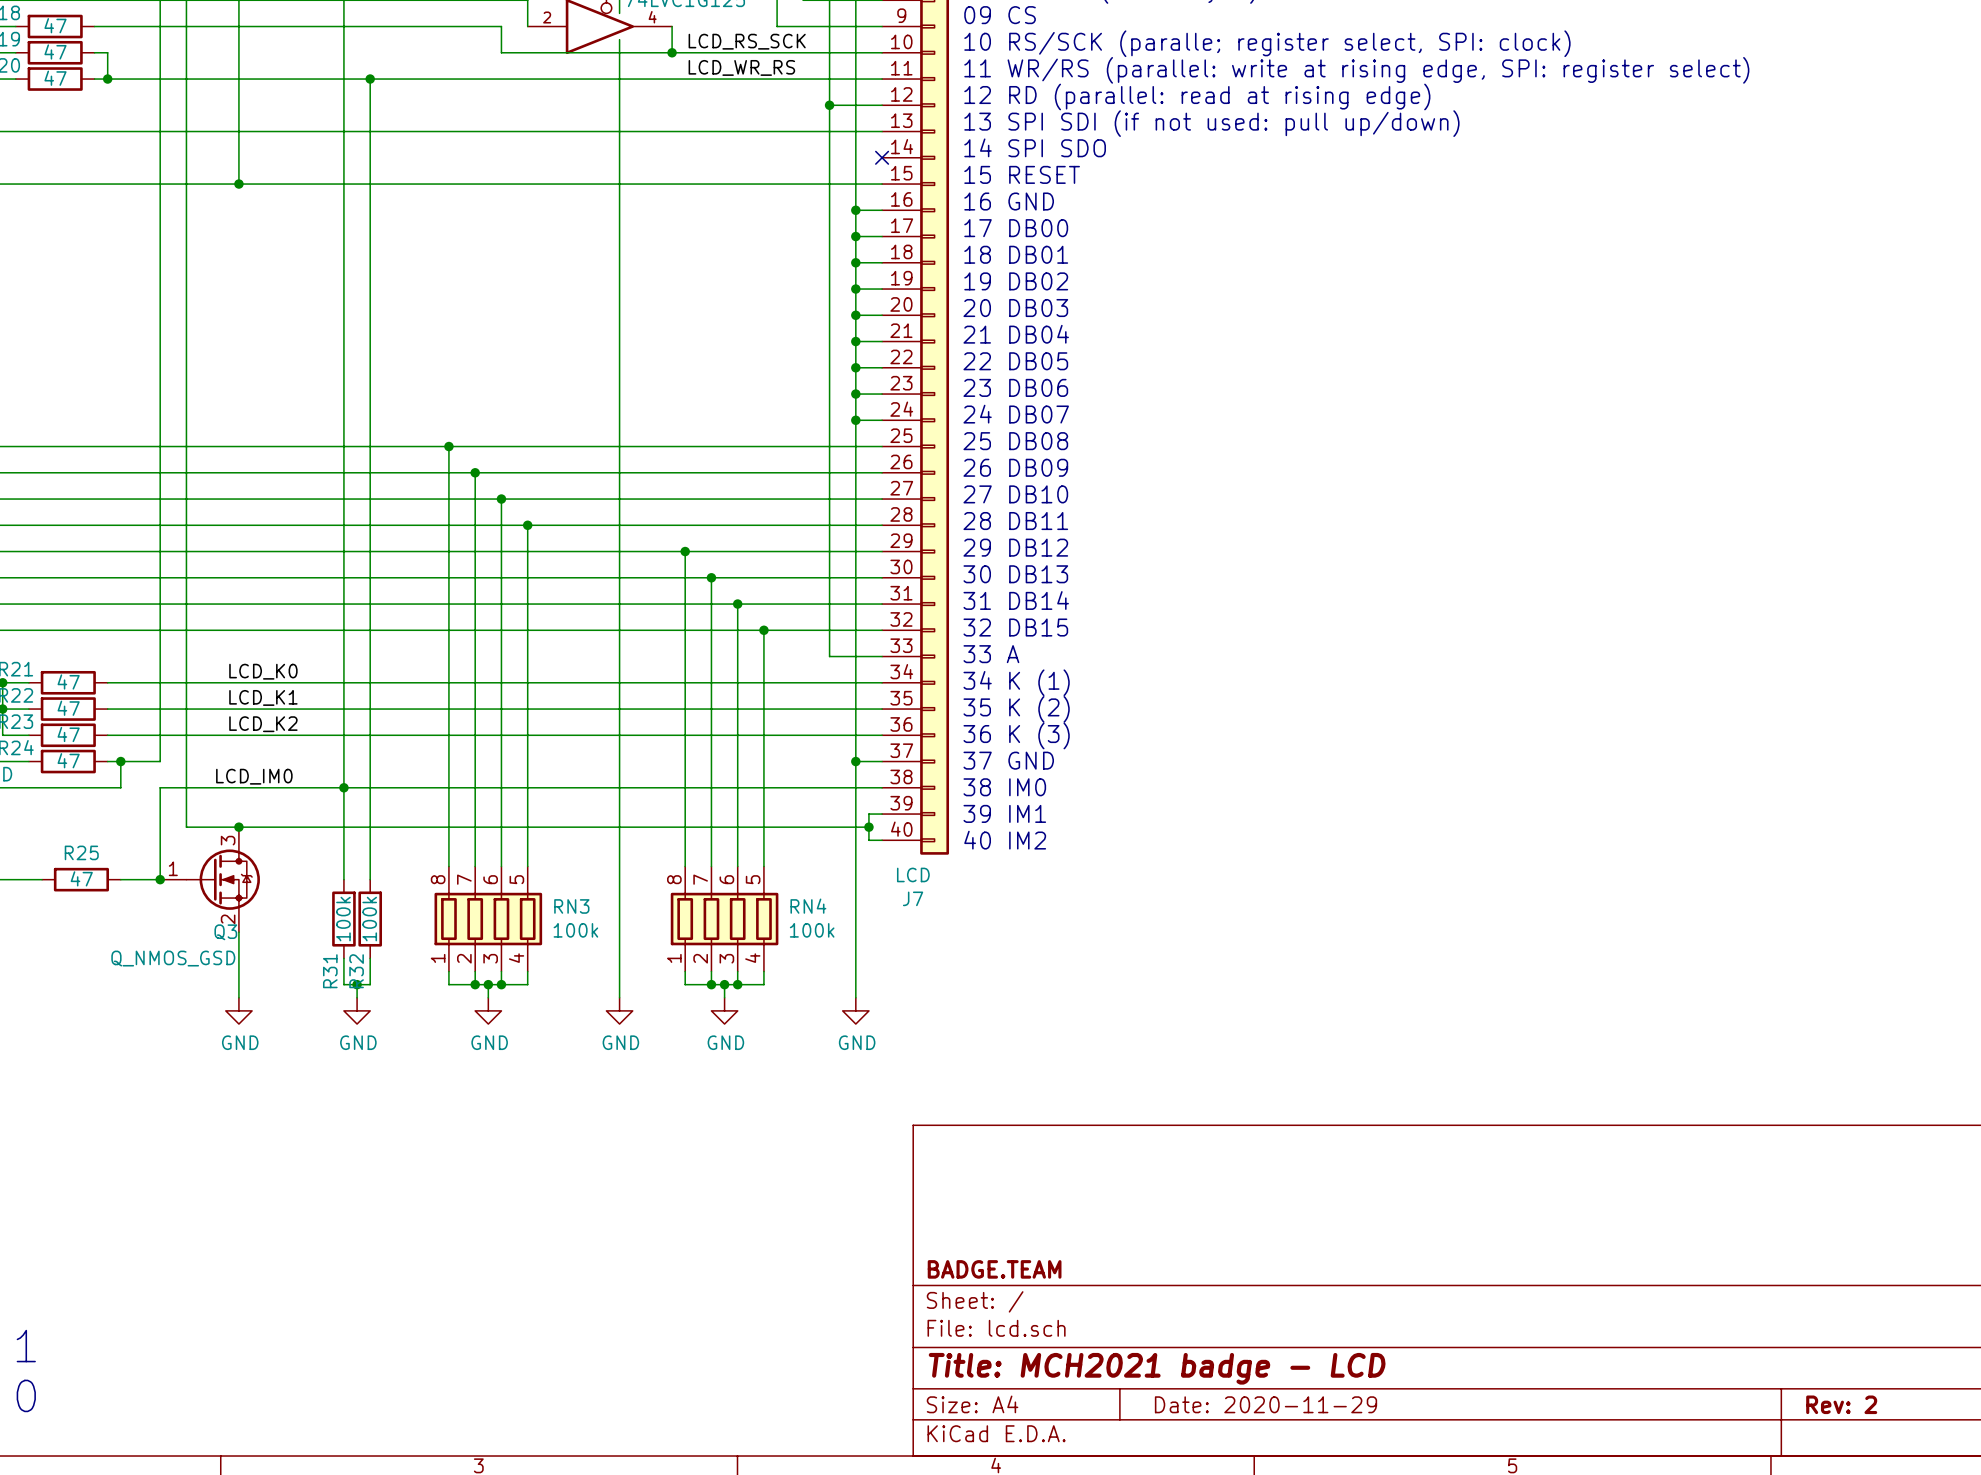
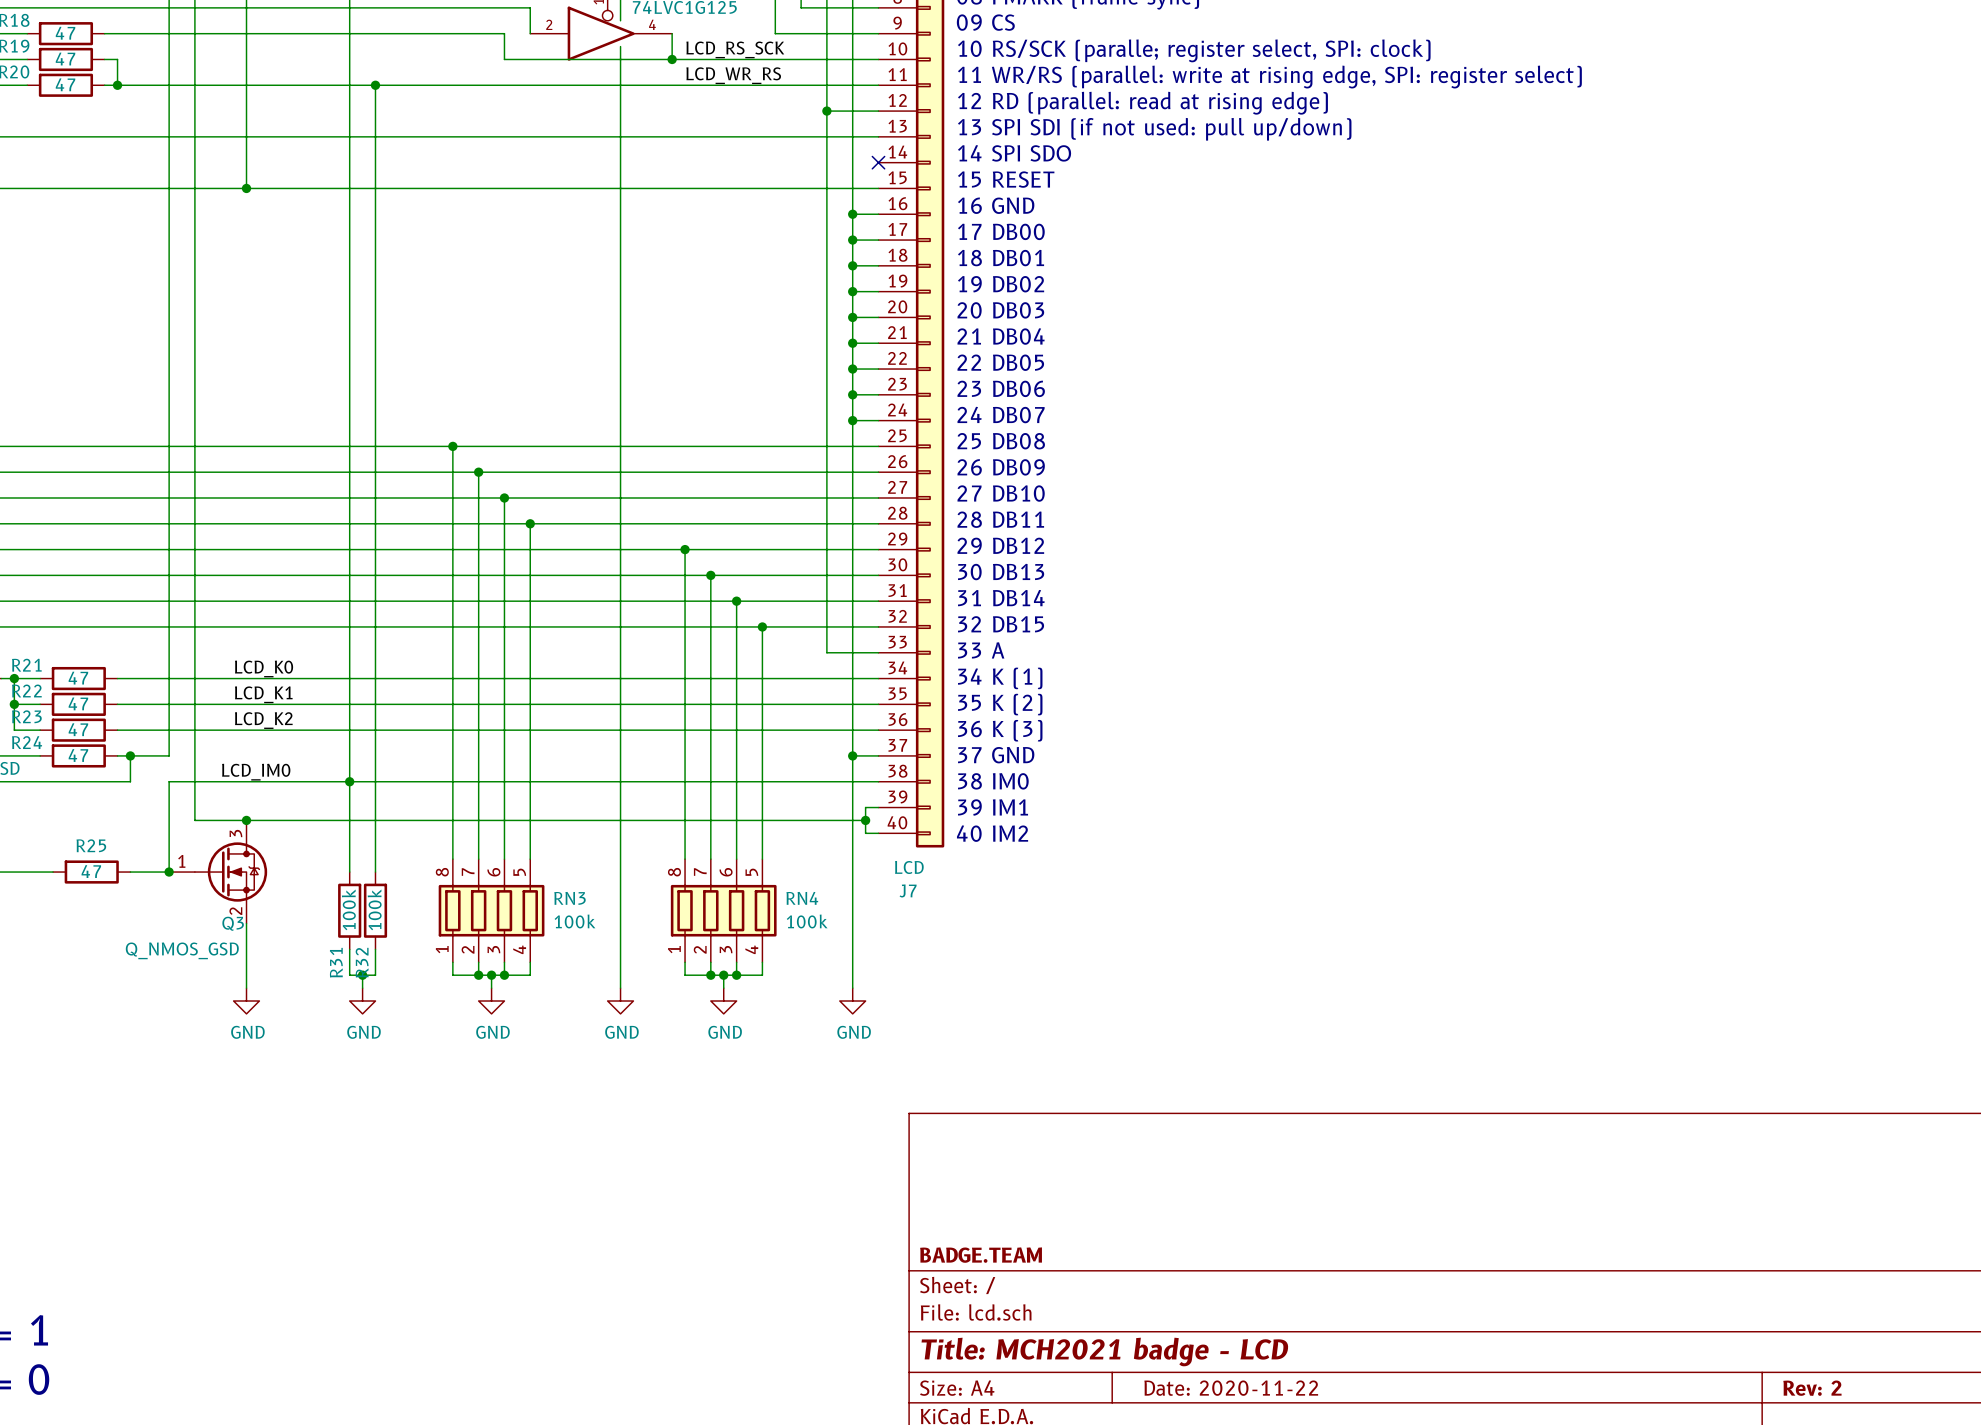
title block: Date: 2020-11-29 (1266, 1404) -> Date: 2020-11-22 (1231, 1388)

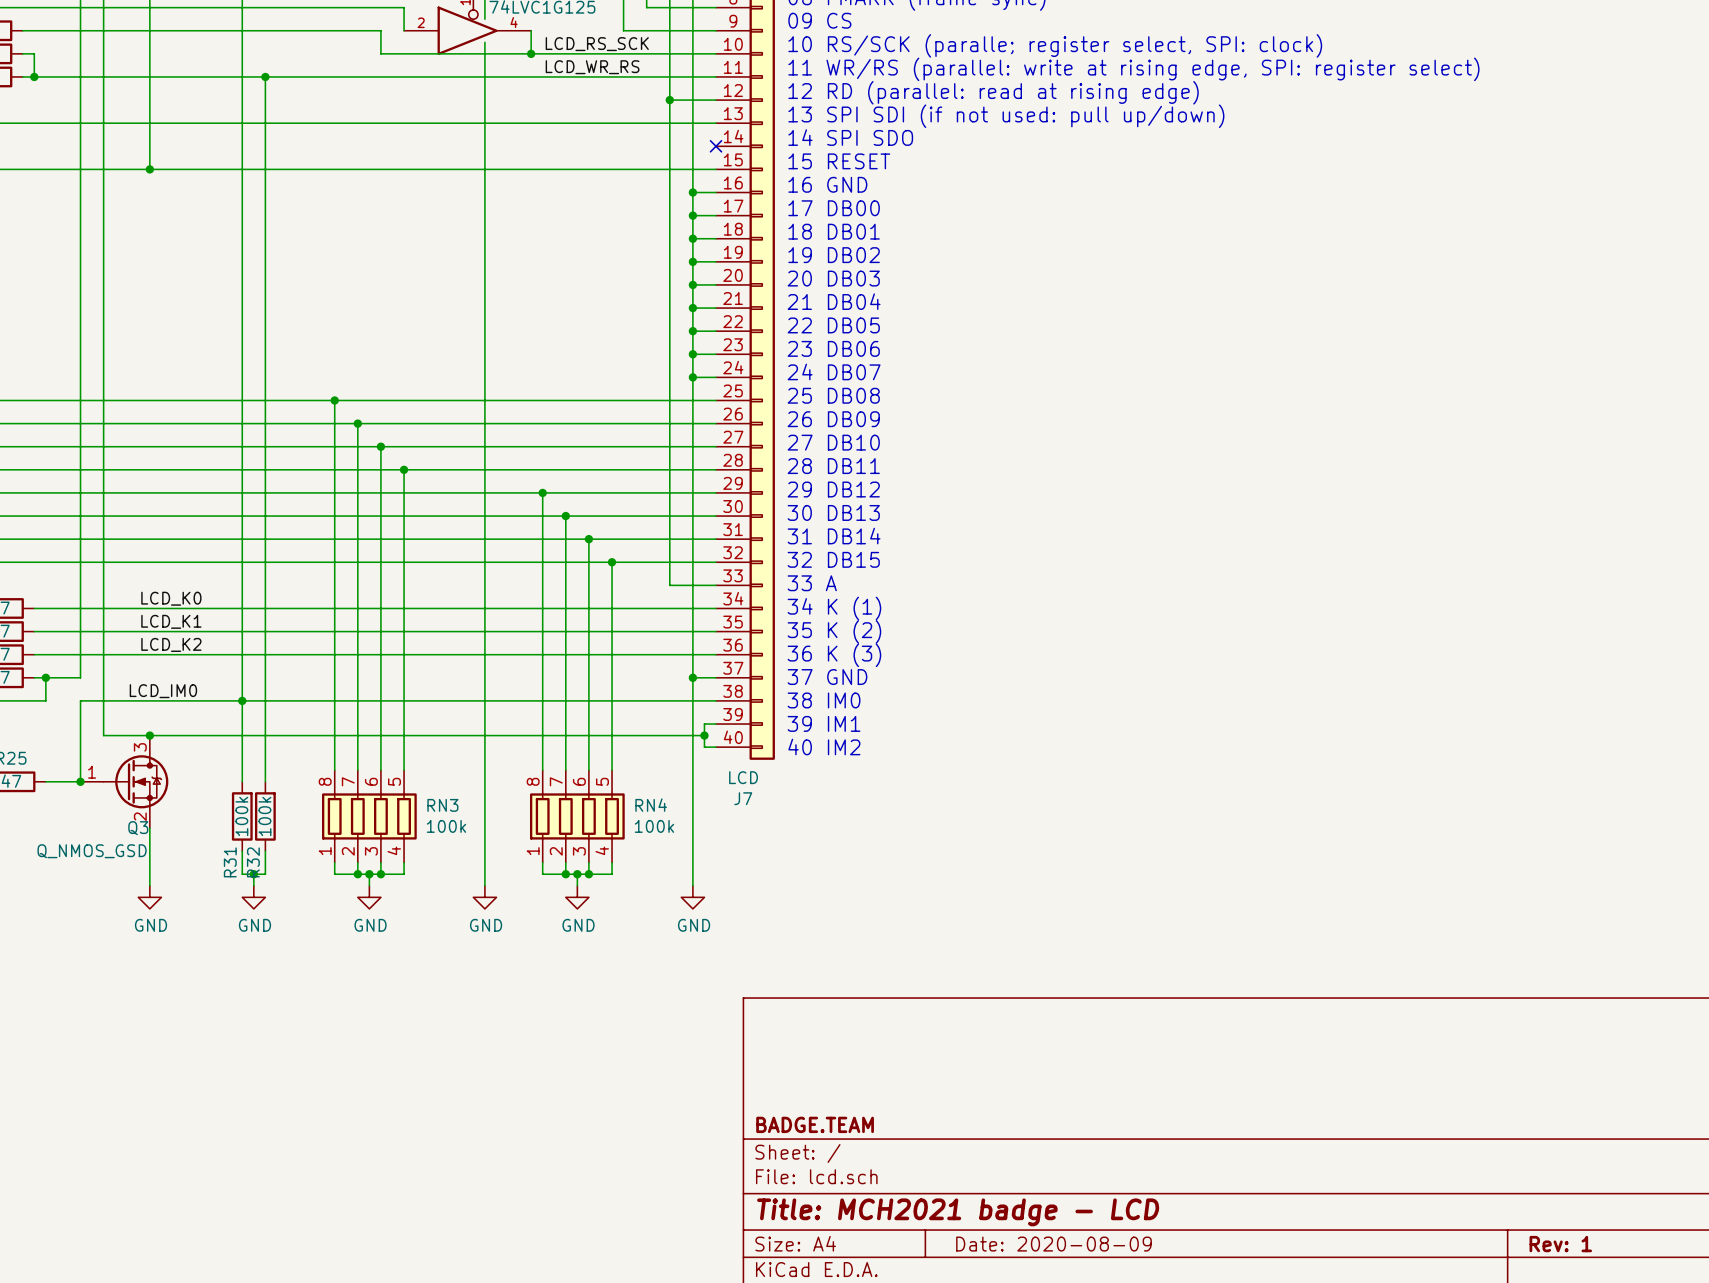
title block: Date: 2020-11-22 (1231, 1388) -> Date: 2020-08-09 (1053, 1244)
title block: Rev: 2 (1812, 1388) -> Rev: 1 (1560, 1244)

